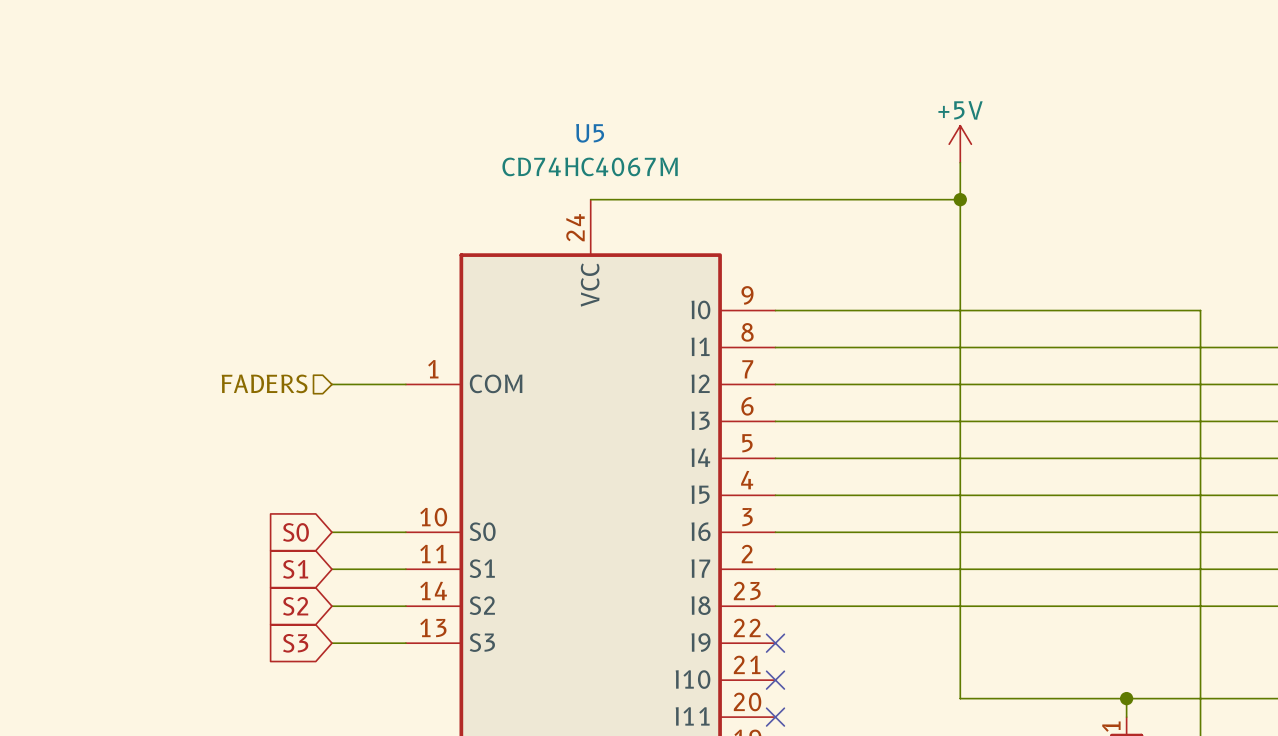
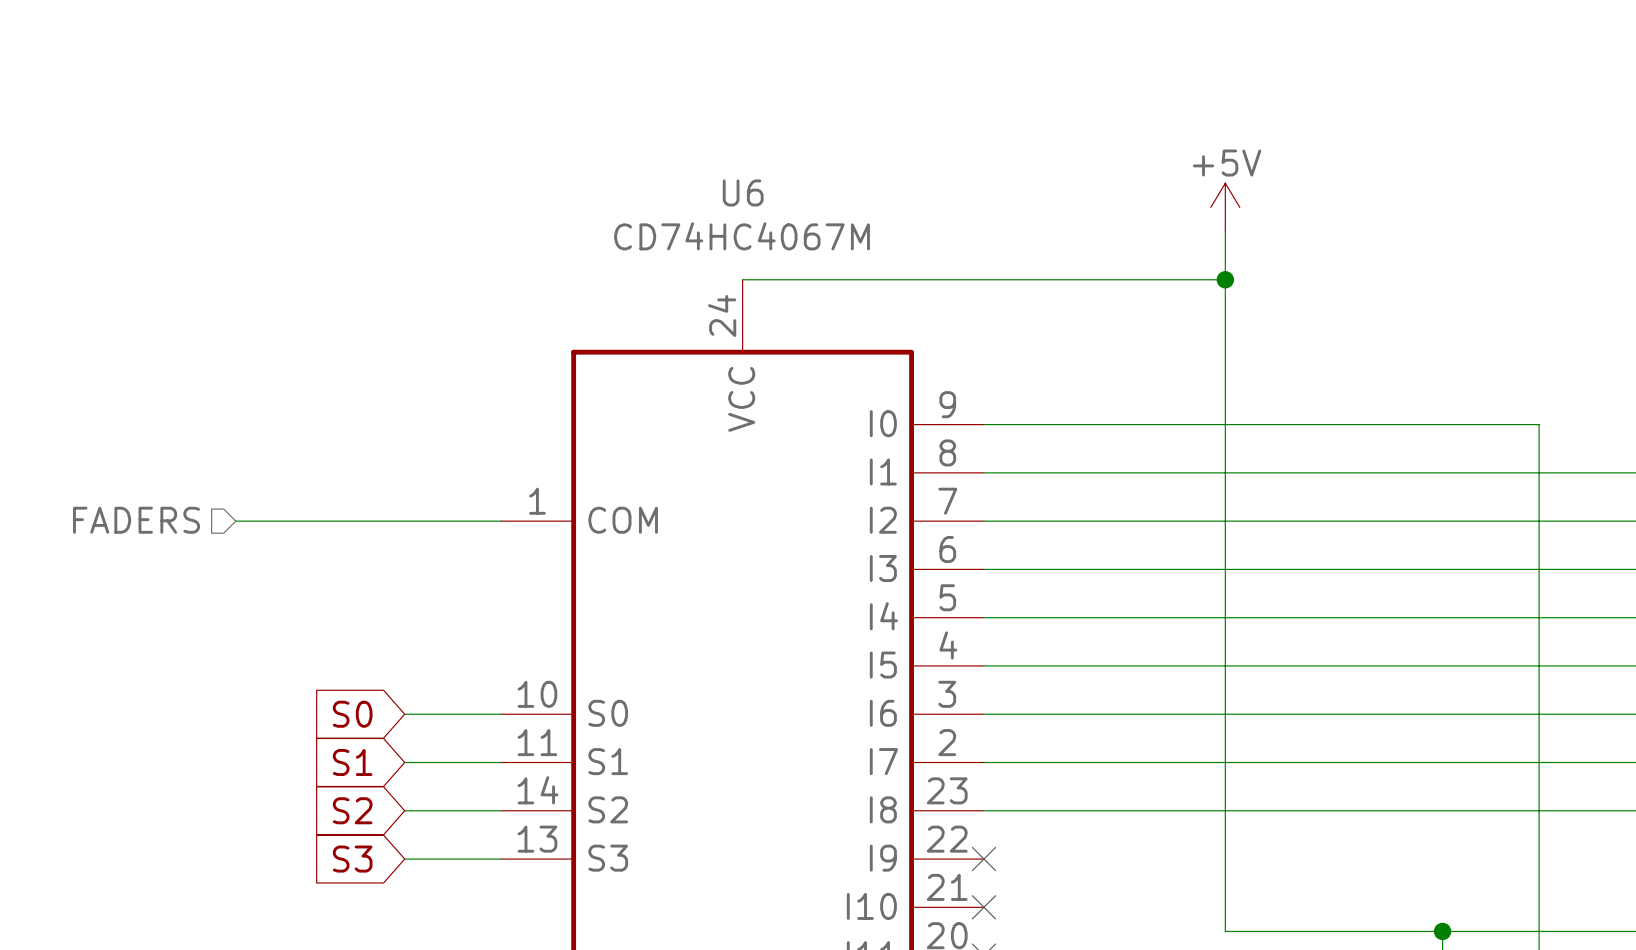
U5 name: U5 (590, 133) -> U6 (743, 192)
hierarchical label position: FADERS (264, 383) -> FADERS (136, 520)
wire: none -> (235, 521) (404, 521)

